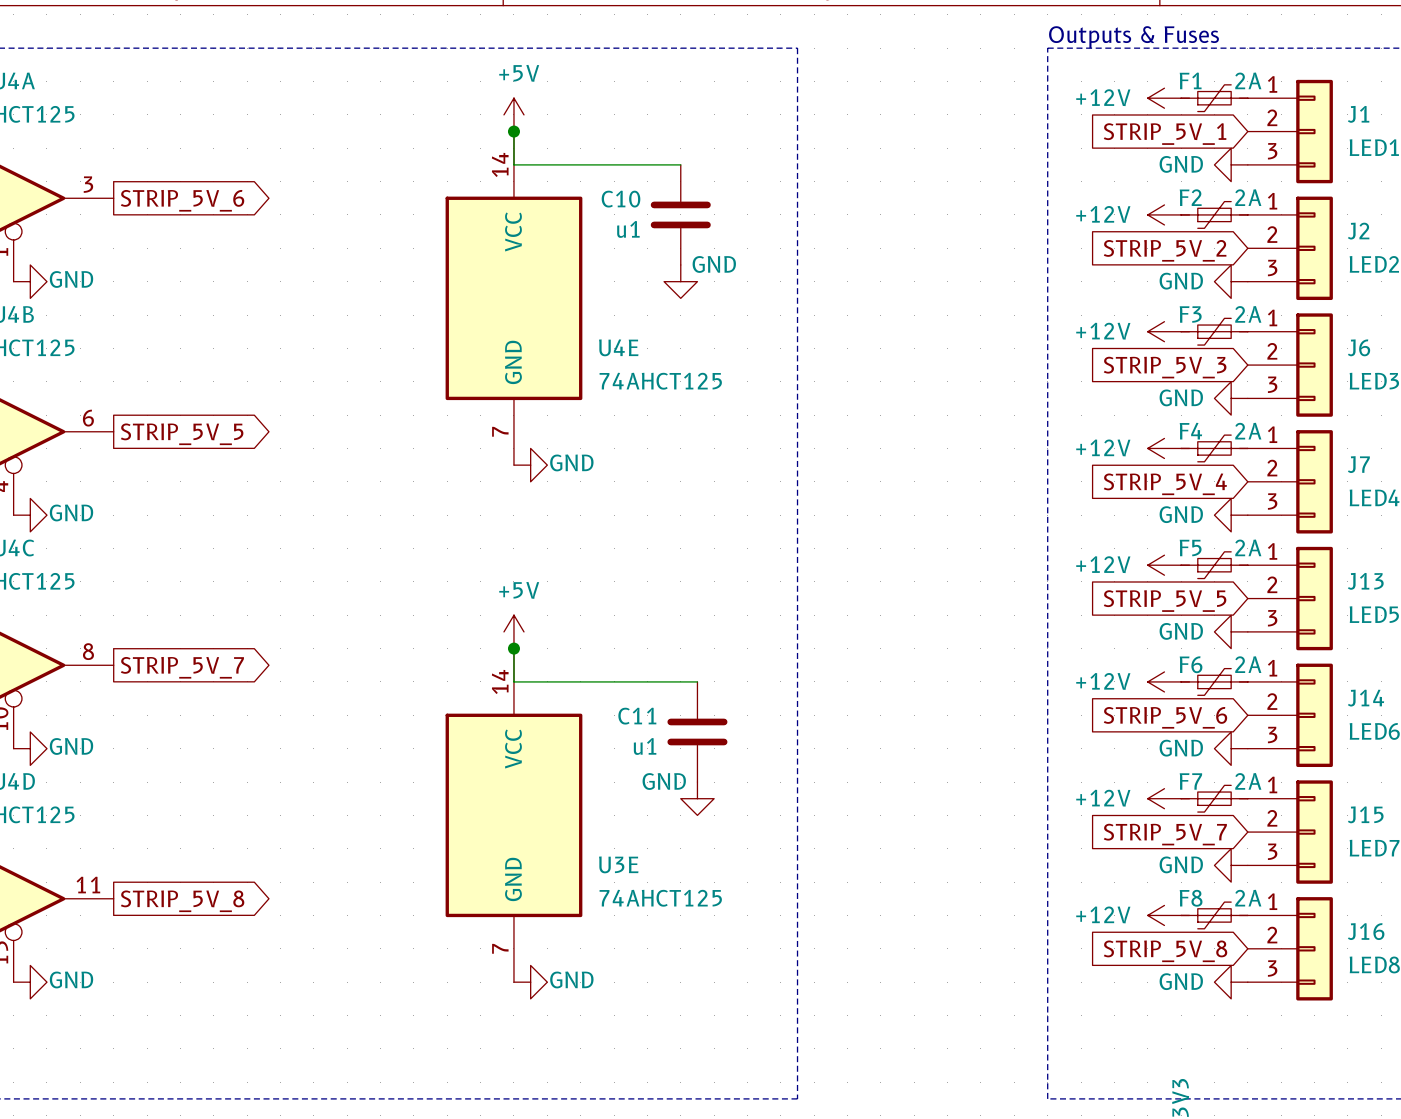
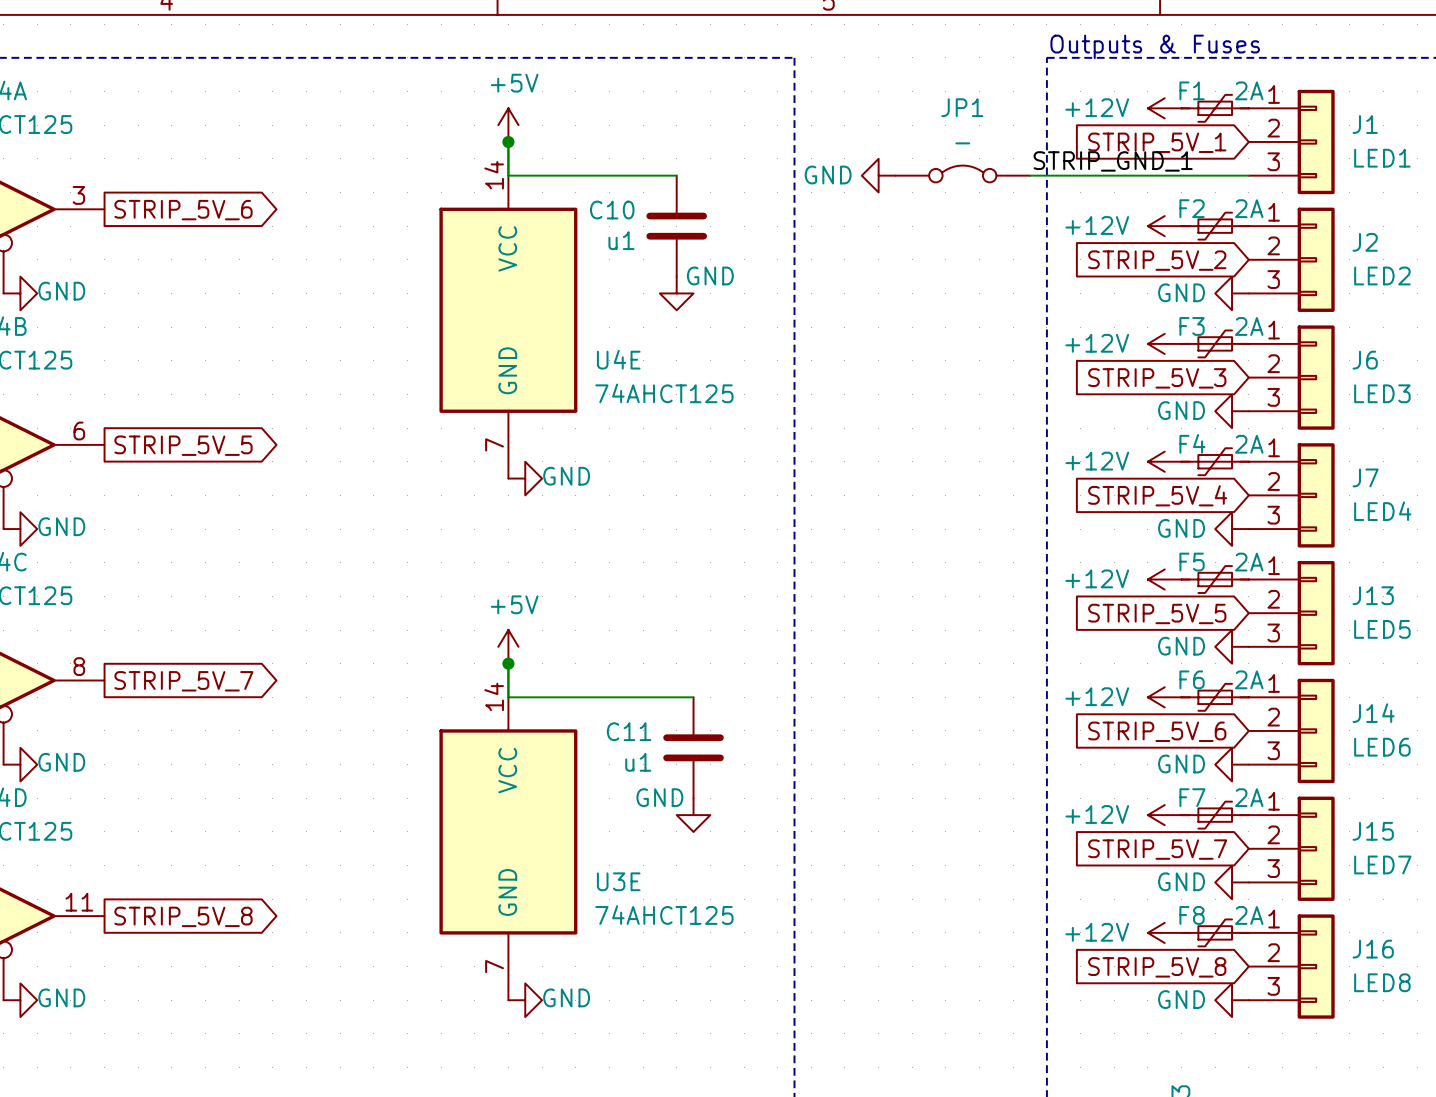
label: none -> STRIP_GND_1 (1113, 161)
JP1: none -> - (962, 173)
power symbol: none -> GND (878, 175)
wire: none -> (1030, 175) (1248, 175)
power symbol: GND (1231, 164) -> none

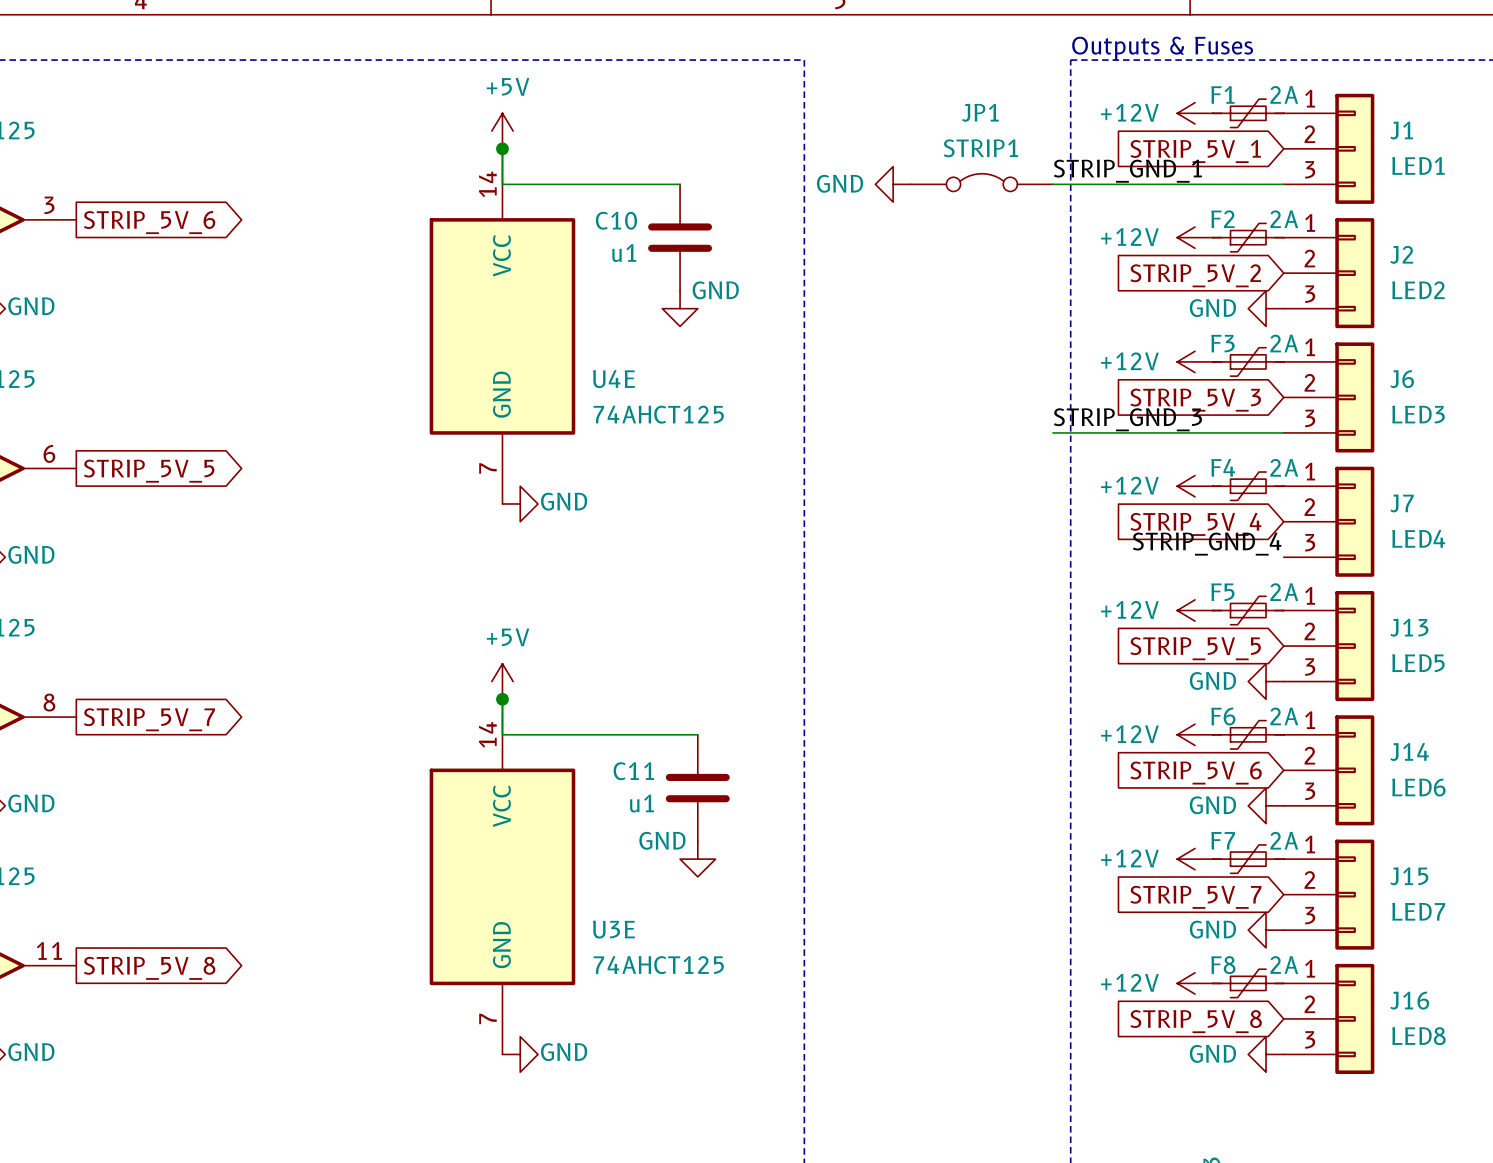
JP1 value: - (962, 143) -> STRIP1 (980, 148)
label: none -> STRIP_GND_3 (1127, 419)
wire: none -> (1052, 432) (1283, 432)
power symbol: GND (1232, 411) -> none
label: none -> STRIP_GND_4 (1207, 544)
power symbol: GND (1232, 529) -> none

